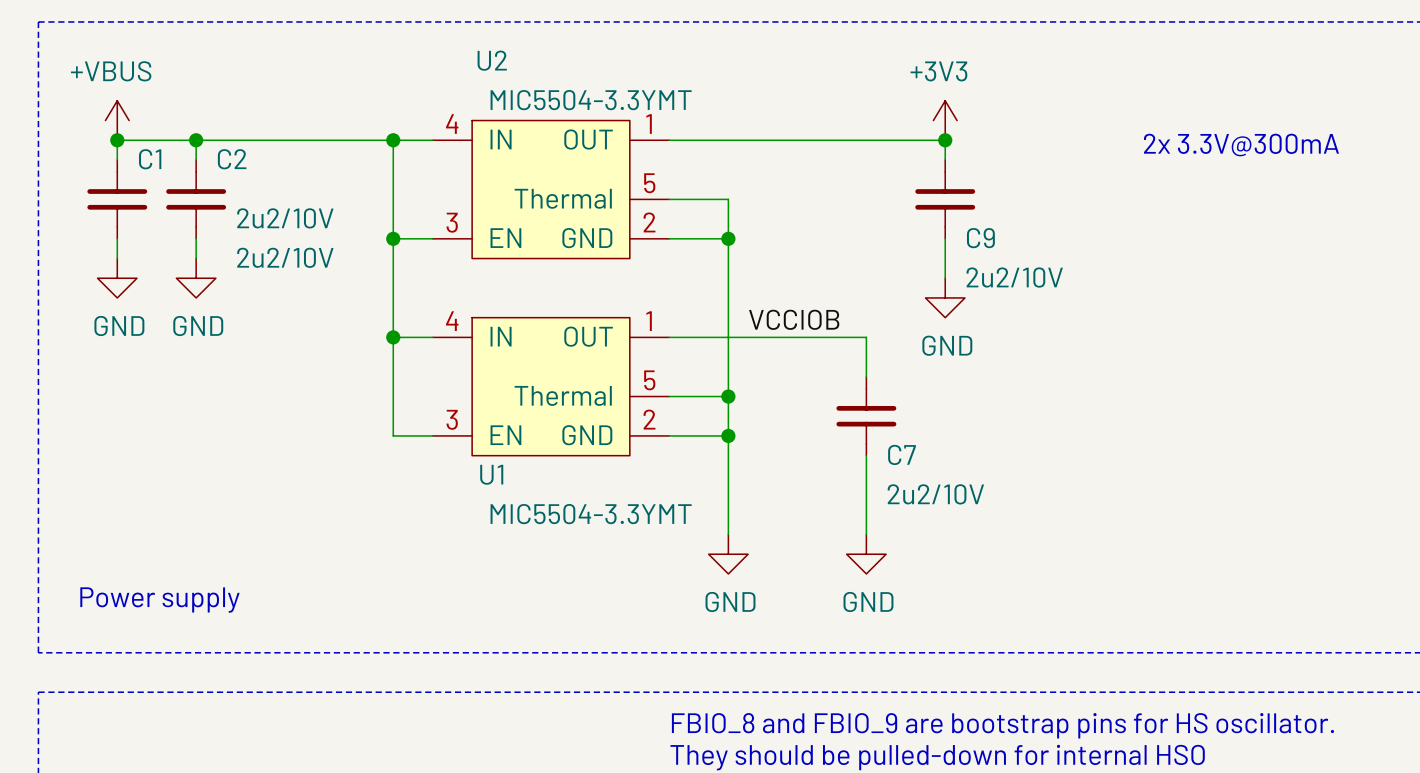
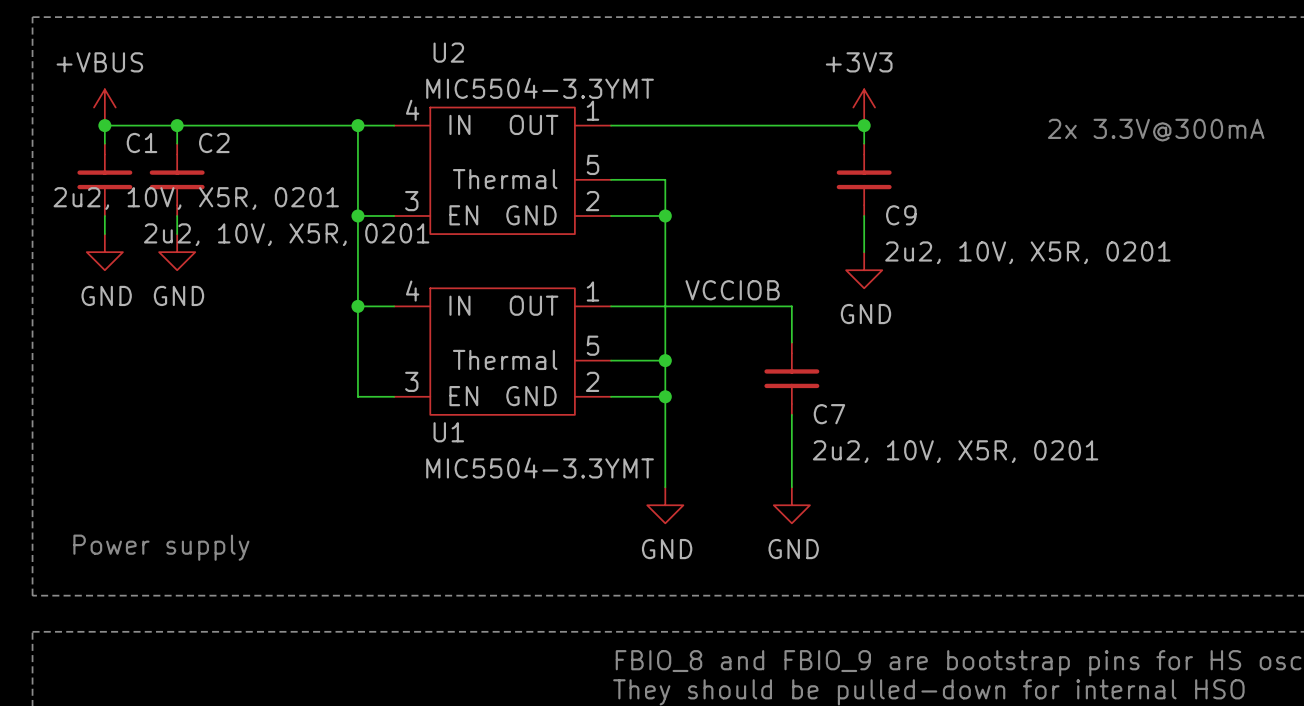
C1 value: 2u2/10V (285, 218) -> 2u2, 10V, X5R, 0201 (196, 198)
C2 value: 2u2/10V (285, 257) -> 2u2, 10V, X5R, 0201 (286, 234)
C9 value: 2u2/10V (1014, 277) -> 2u2, 10V, X5R, 0201 (1027, 252)
C7 value: 2u2/10V (935, 494) -> 2u2, 10V, X5R, 0201 (955, 451)

